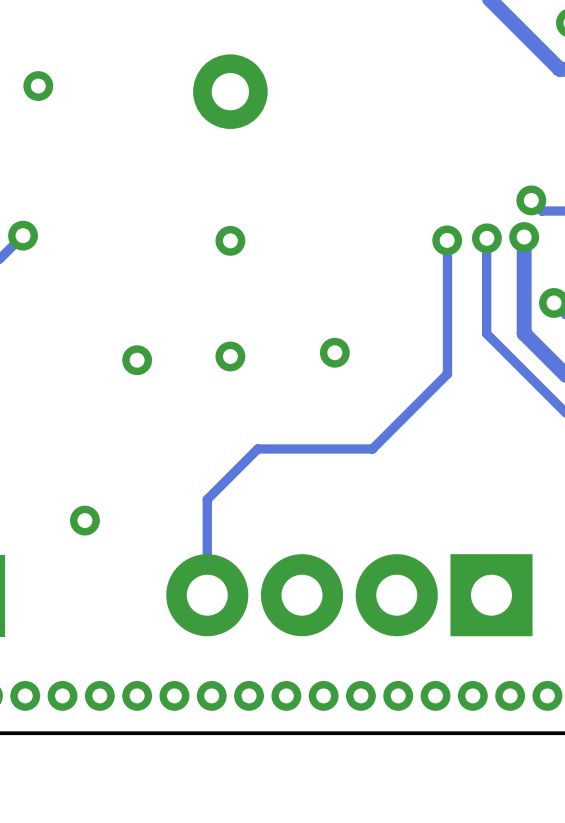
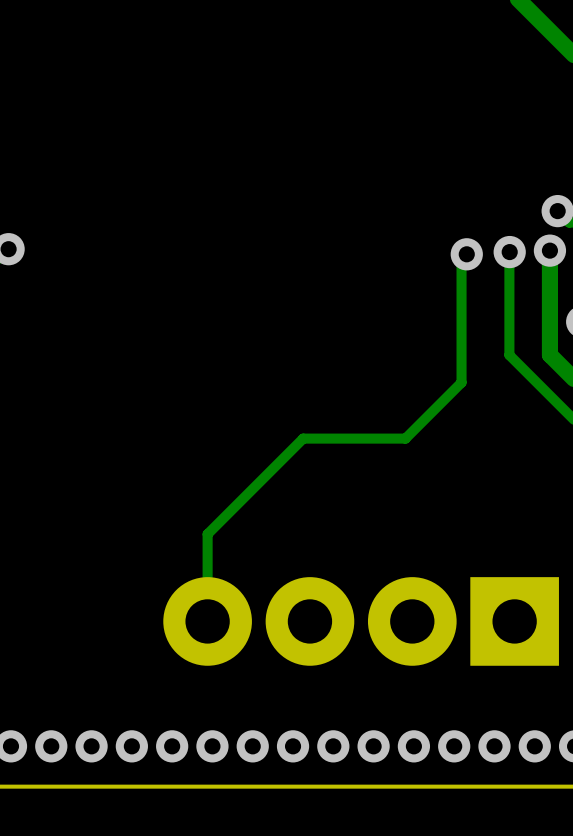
via: (38, 86) -> none
via: (230, 91) -> none
via: (230, 240) -> none
track: (447, 240) (447, 374) (372, 448) (257, 448) -> (461, 249) (461, 382) (405, 438) (303, 438) (262, 479)
via: (334, 352) -> none
via: (230, 356) -> none
via: (137, 360) -> none
via: (84, 520) -> none
part position: (349, 595) -> (361, 621)

